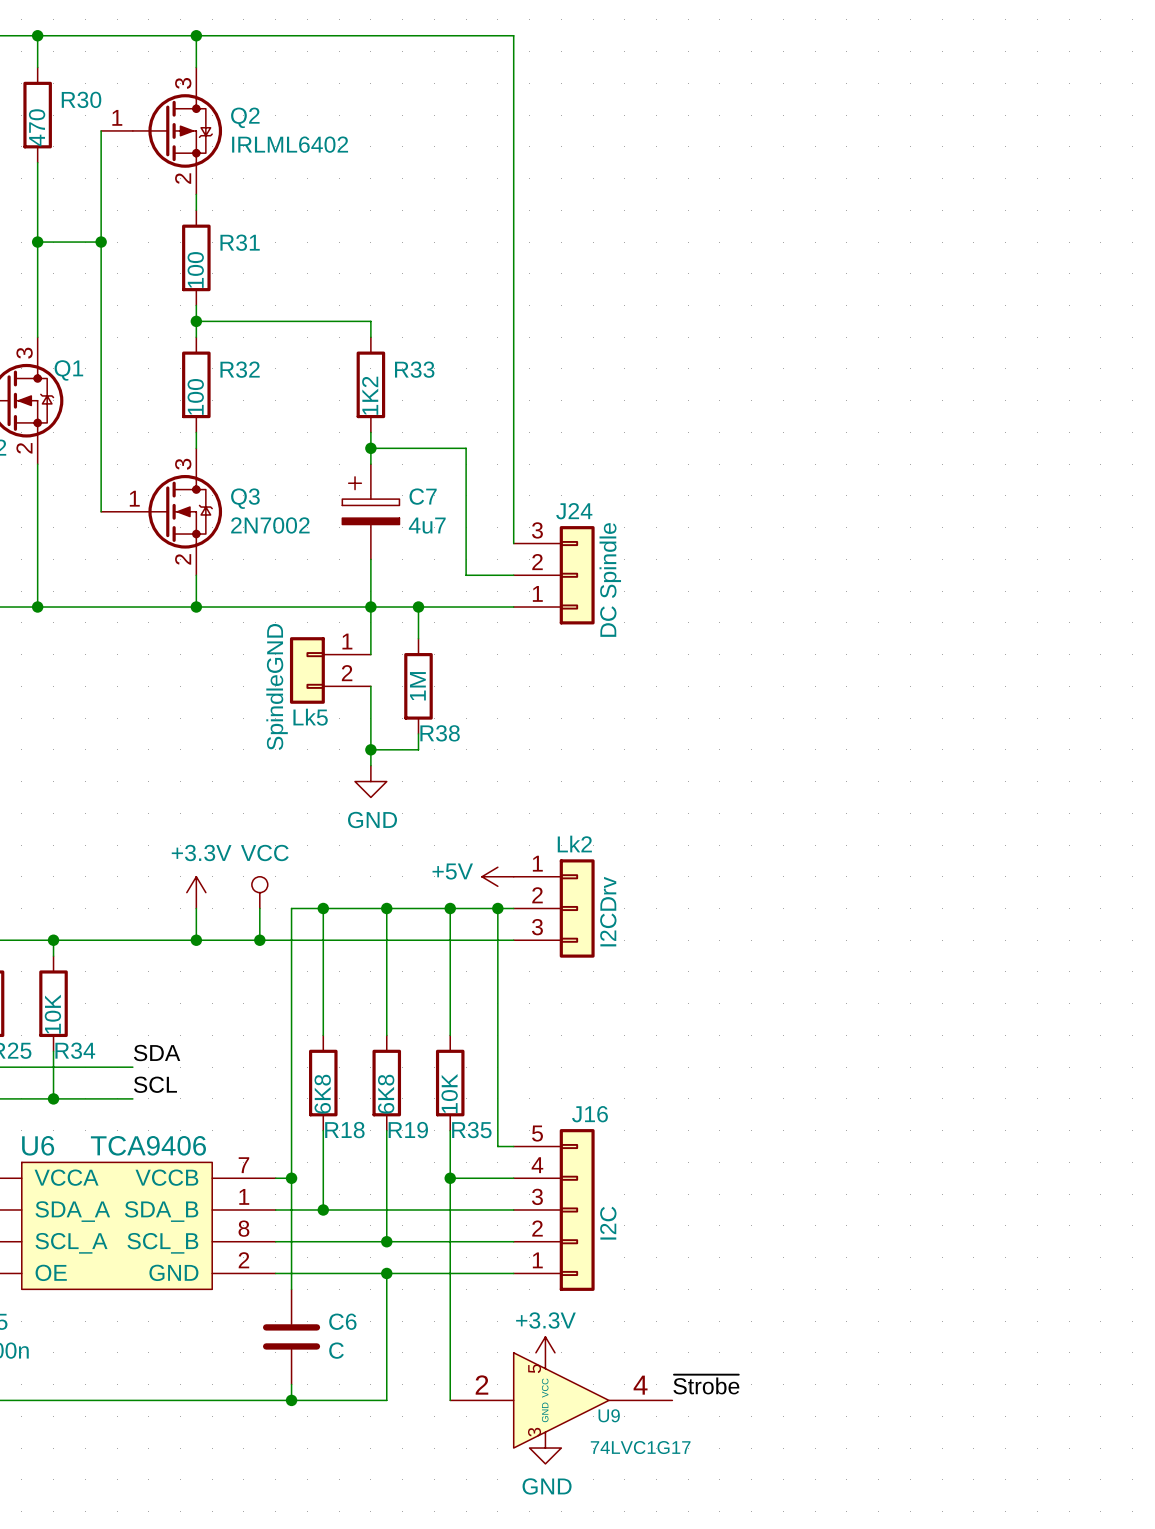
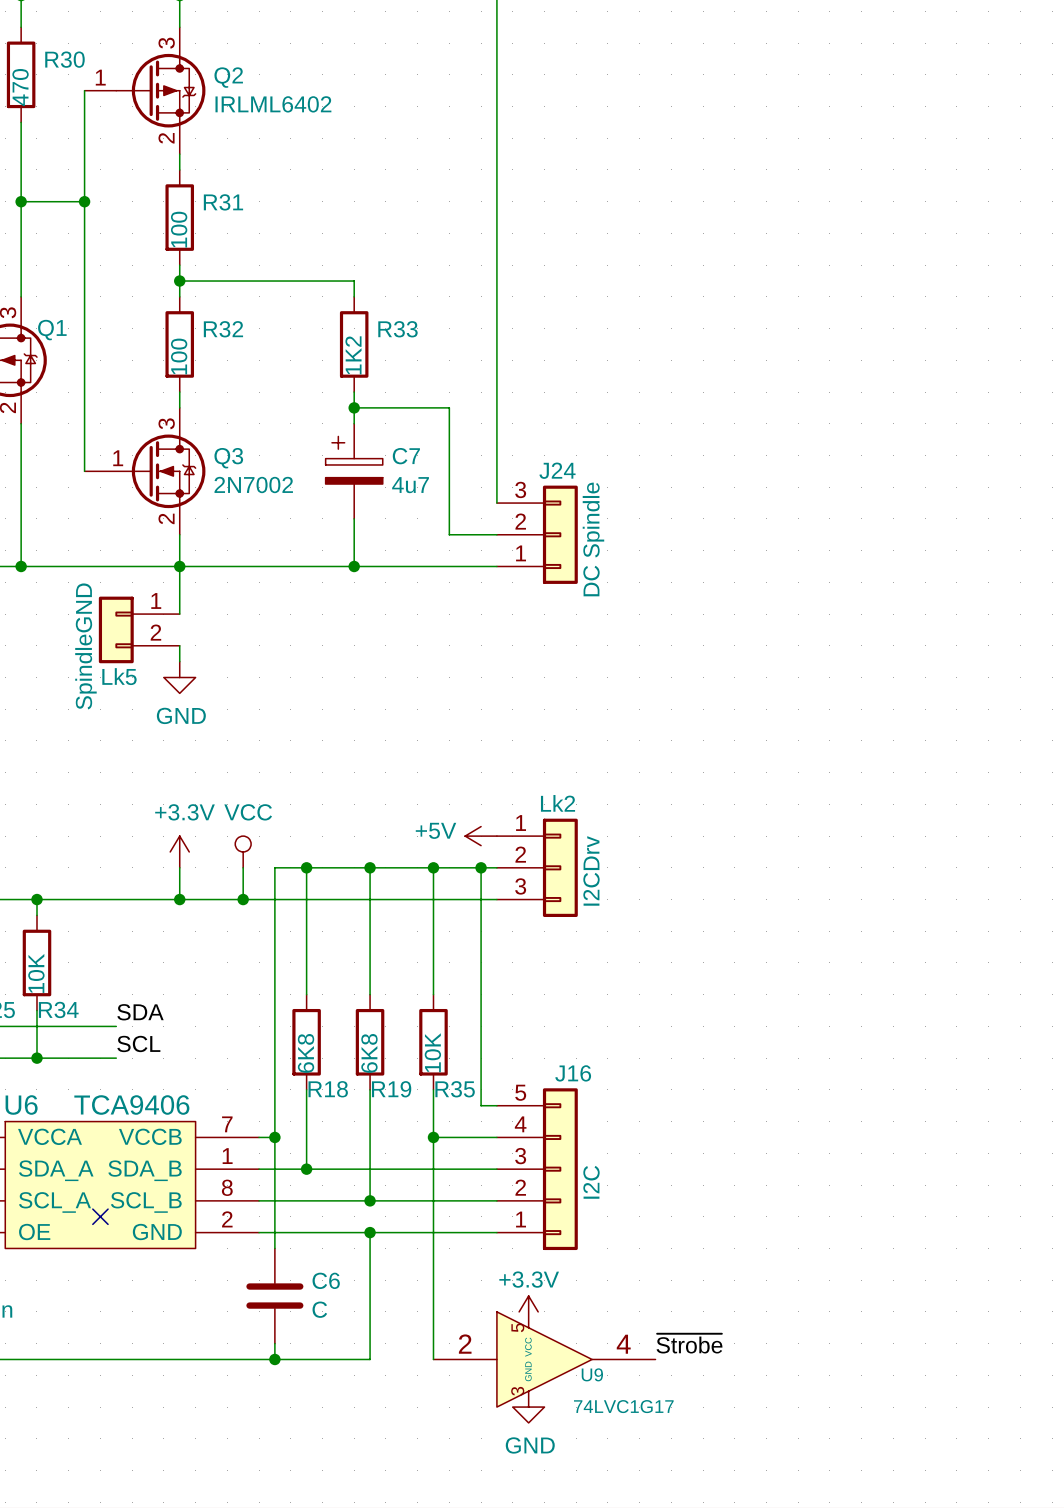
wire: (370, 607) (370, 654) -> (179, 566) (179, 614)
wire: (418, 607) (418, 638) -> none
junction: (418, 607) -> none
Lk5 position: (330, 670) -> (139, 629)
wire: none -> (179, 645) (179, 661)
wire: (370, 686) (370, 765) -> none
R38: 1M (418, 686) -> none
wire: (418, 733) (418, 749) (370, 749) -> none
junction: (370, 749) -> none
power symbol position: GND (370, 781) -> GND (179, 677)
no-connect mark: none -> (100, 1216)

